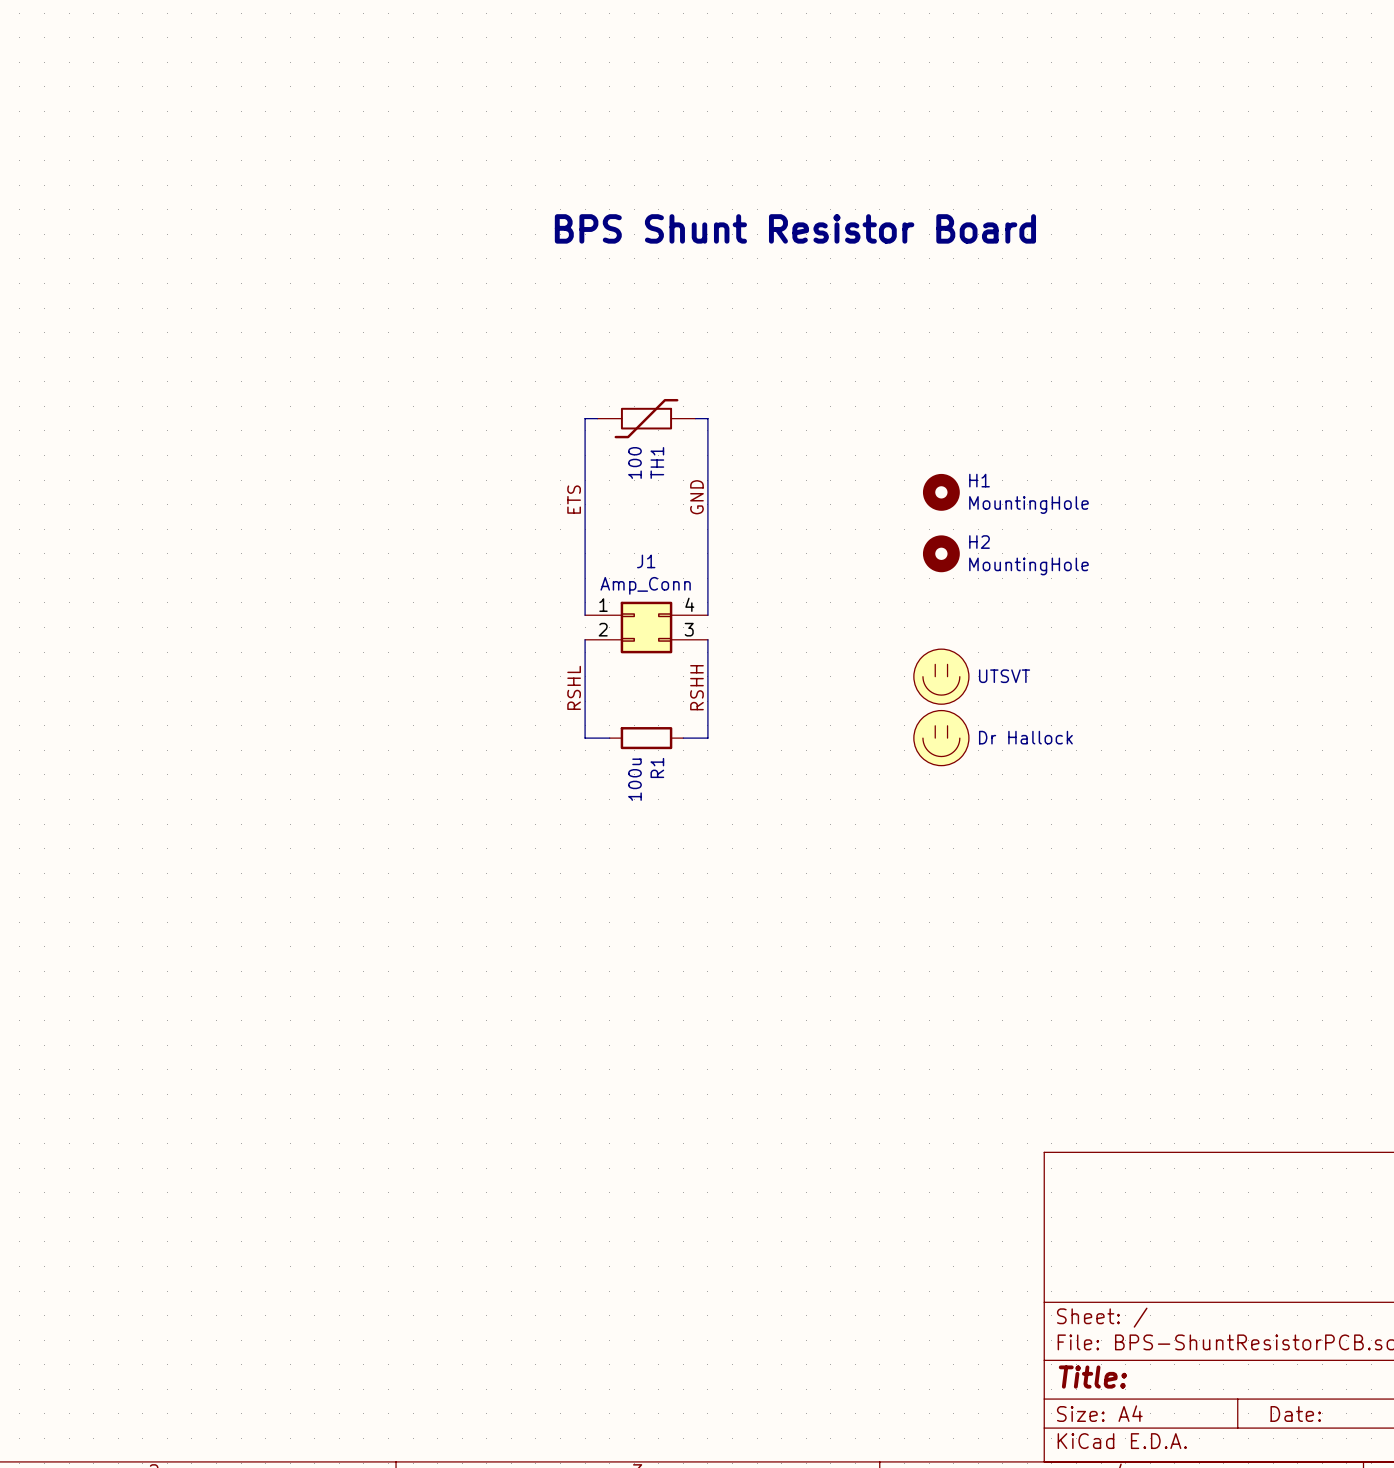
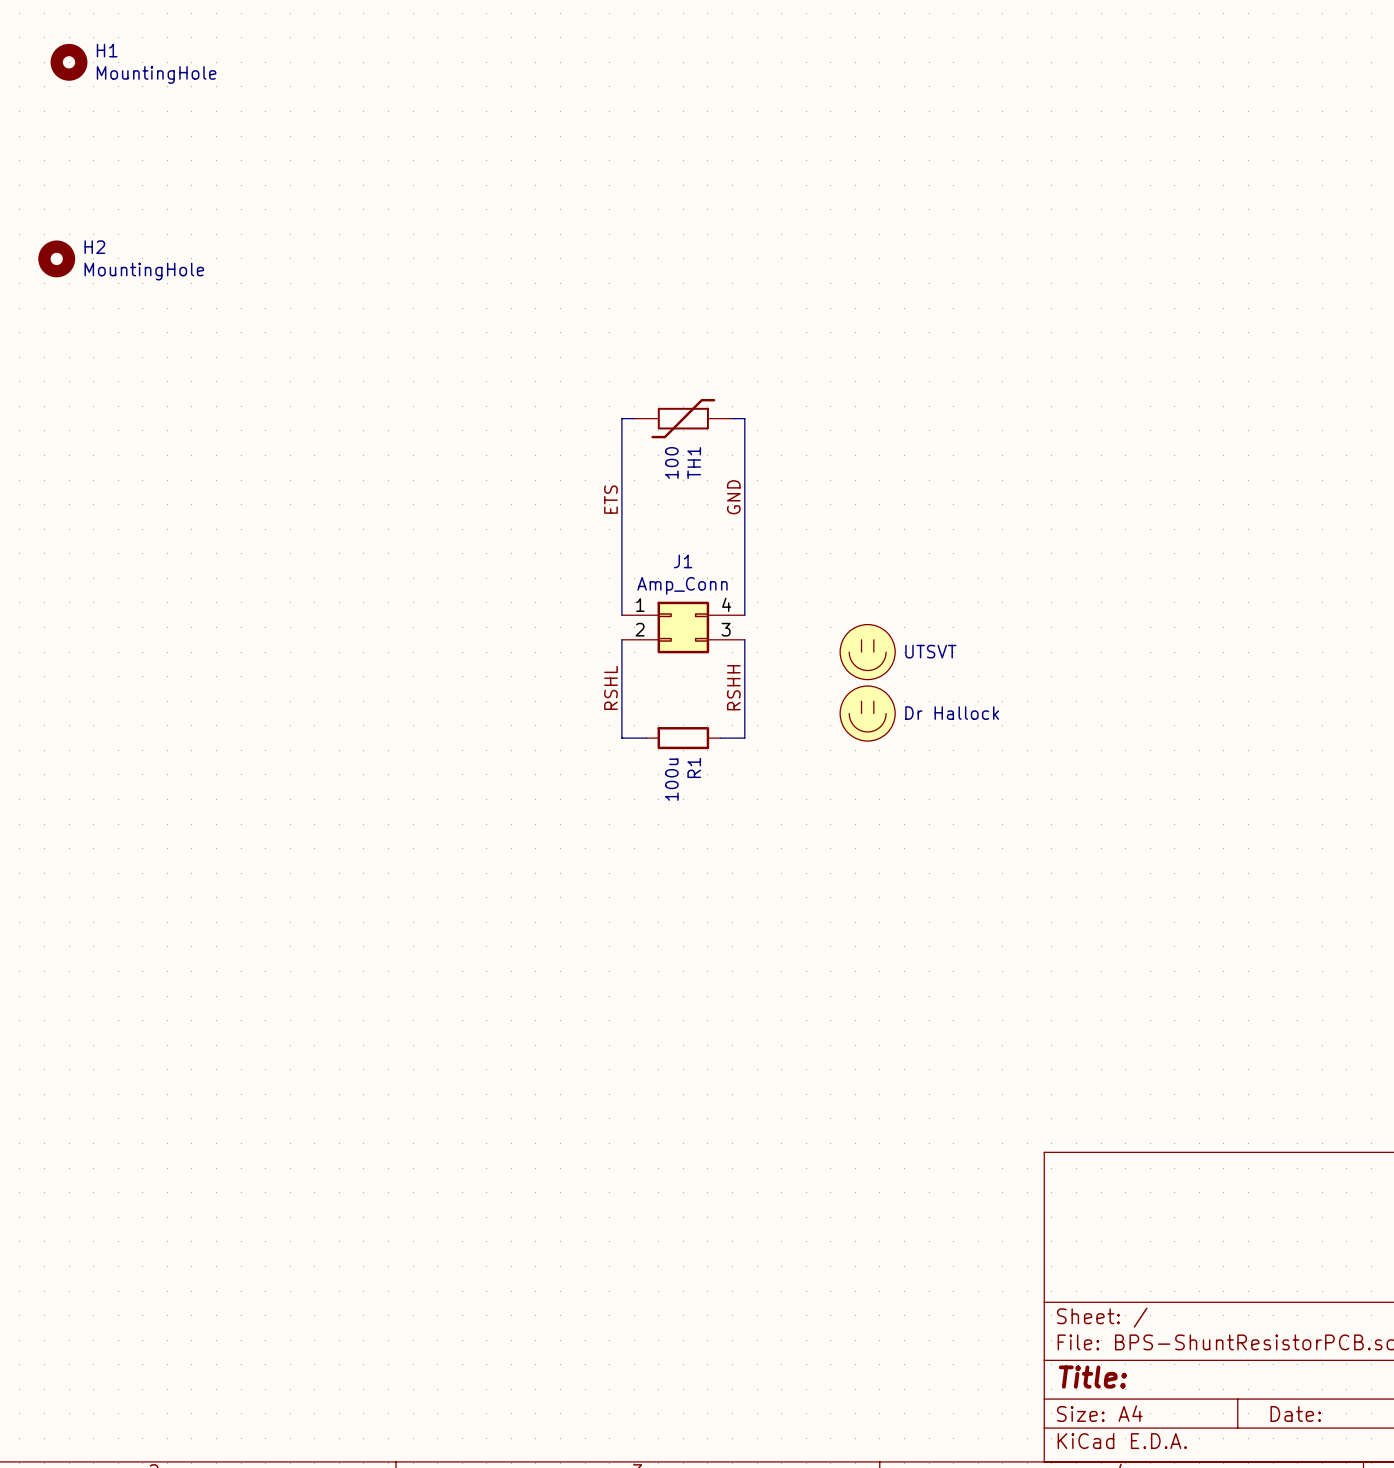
text: BPS Shunt Resistor Board (795, 228) -> none
wire: (597, 418) (585, 418) (585, 615) -> (634, 418) (621, 418) (621, 615)
TH1 position: (646, 418) -> (683, 418)
wire: (695, 418) (707, 418) (707, 615) -> (732, 418) (744, 418) (744, 615)
H1 position: (941, 492) -> (69, 62)
label position: GND (696, 497) -> GND (733, 497)
label position: ETS (574, 499) -> ETS (610, 499)
H2 position: (941, 553) -> (56, 258)
J1 position: (646, 627) -> (683, 627)
wire: (585, 639) (585, 738) (609, 738) -> (621, 639) (621, 738) (646, 738)
wire: (707, 639) (707, 738) (683, 738) -> (744, 639) (744, 738) (720, 738)
part position: (941, 676) -> (867, 652)
label position: RSHL (574, 687) -> RSHL (610, 687)
label position: RSHH (696, 687) -> RSHH (733, 687)
R1 position: (646, 738) -> (683, 738)
part position: (941, 738) -> (867, 713)

